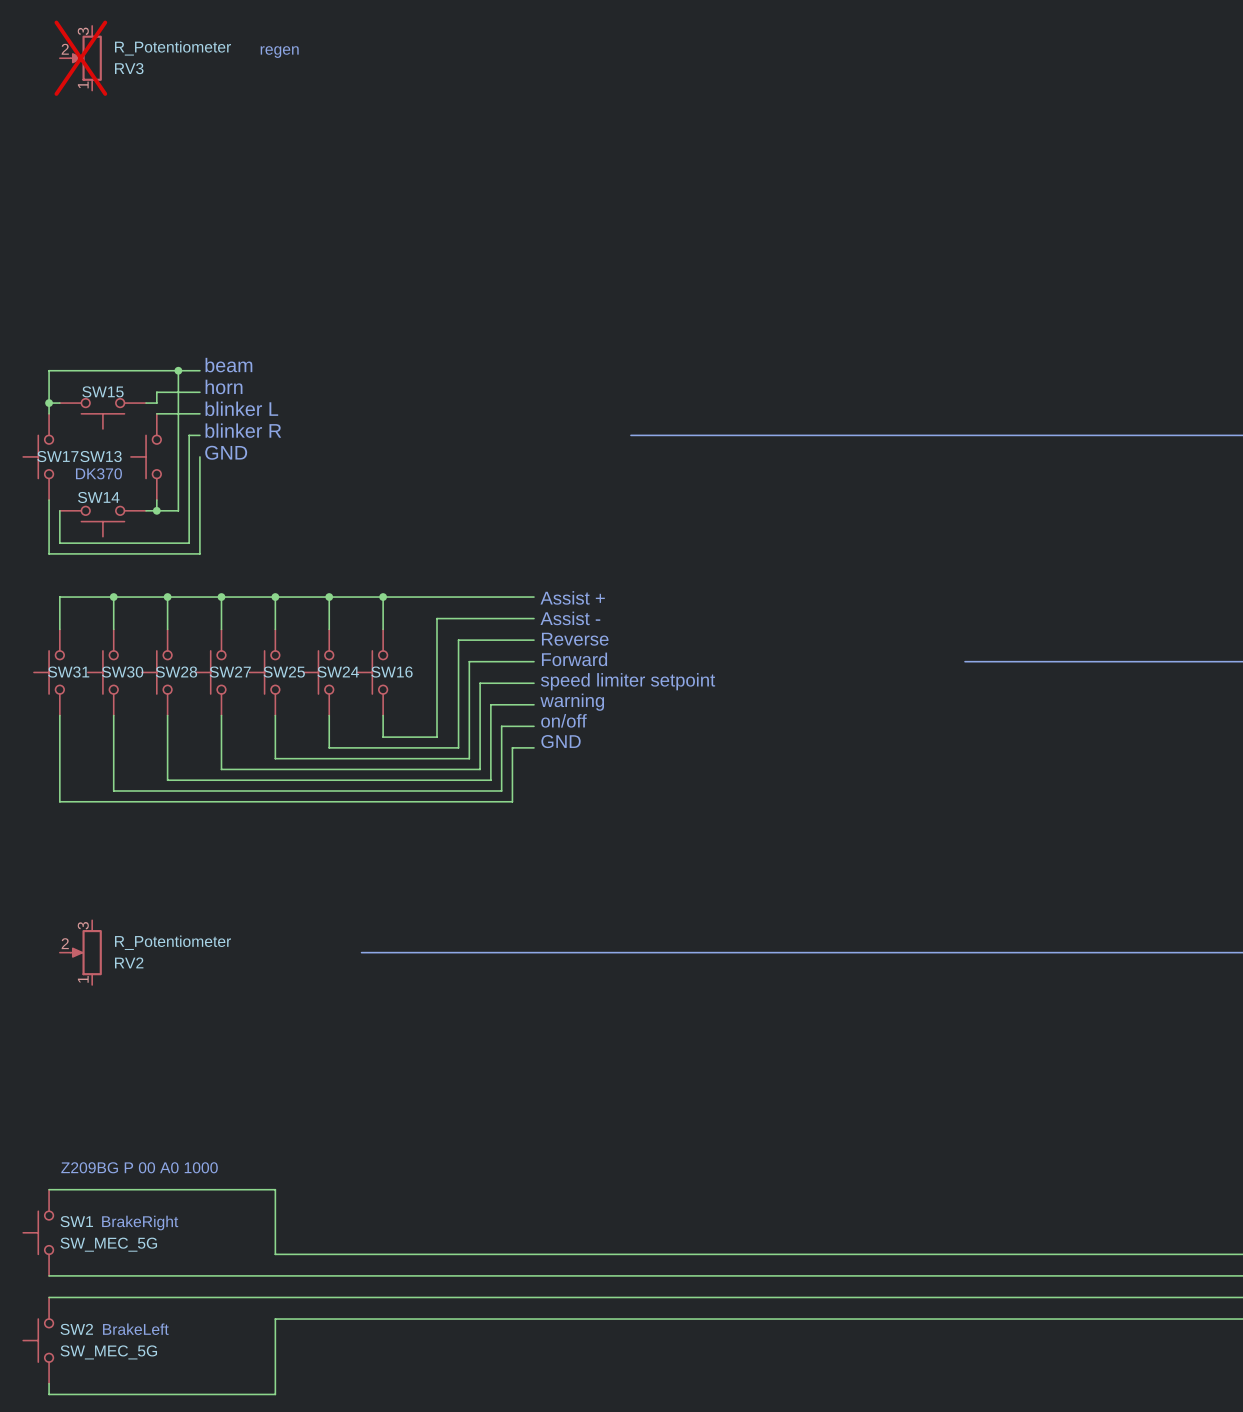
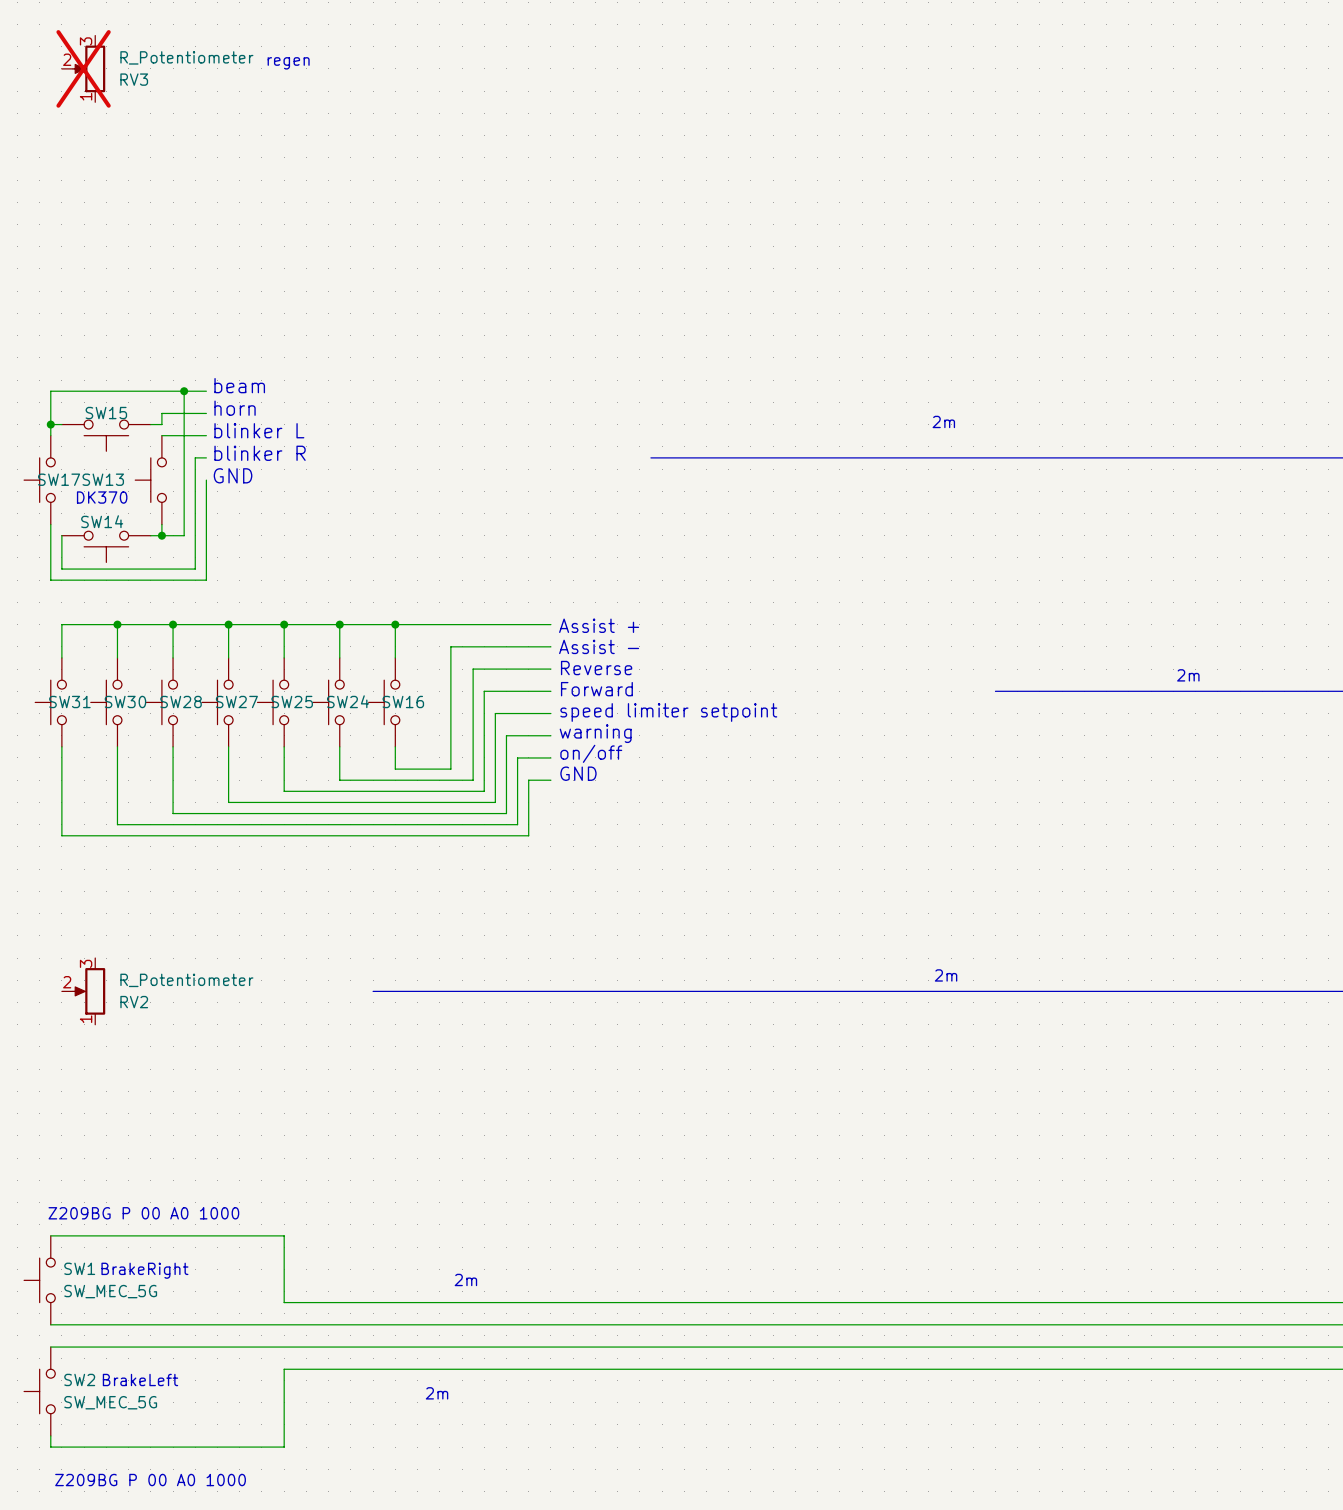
text: none -> 2m (943, 421)
text: none -> 2m (1188, 675)
text: none -> 2m (946, 975)
text: none -> 2m (465, 1279)
text: none -> 2m (437, 1393)

